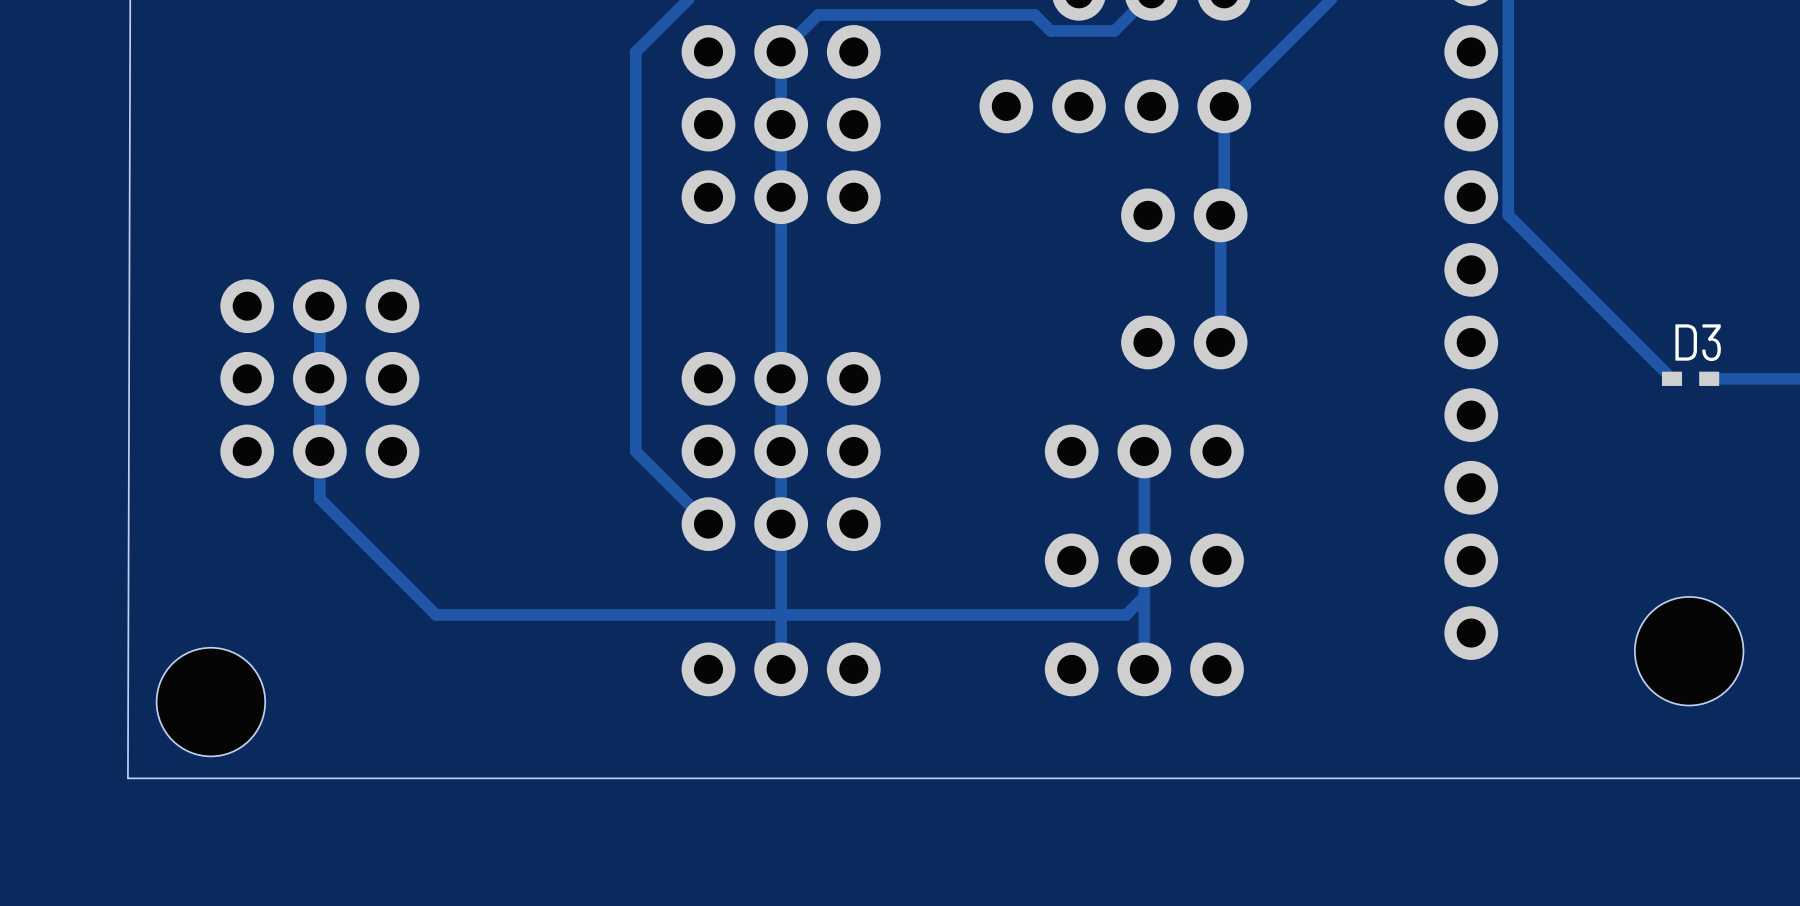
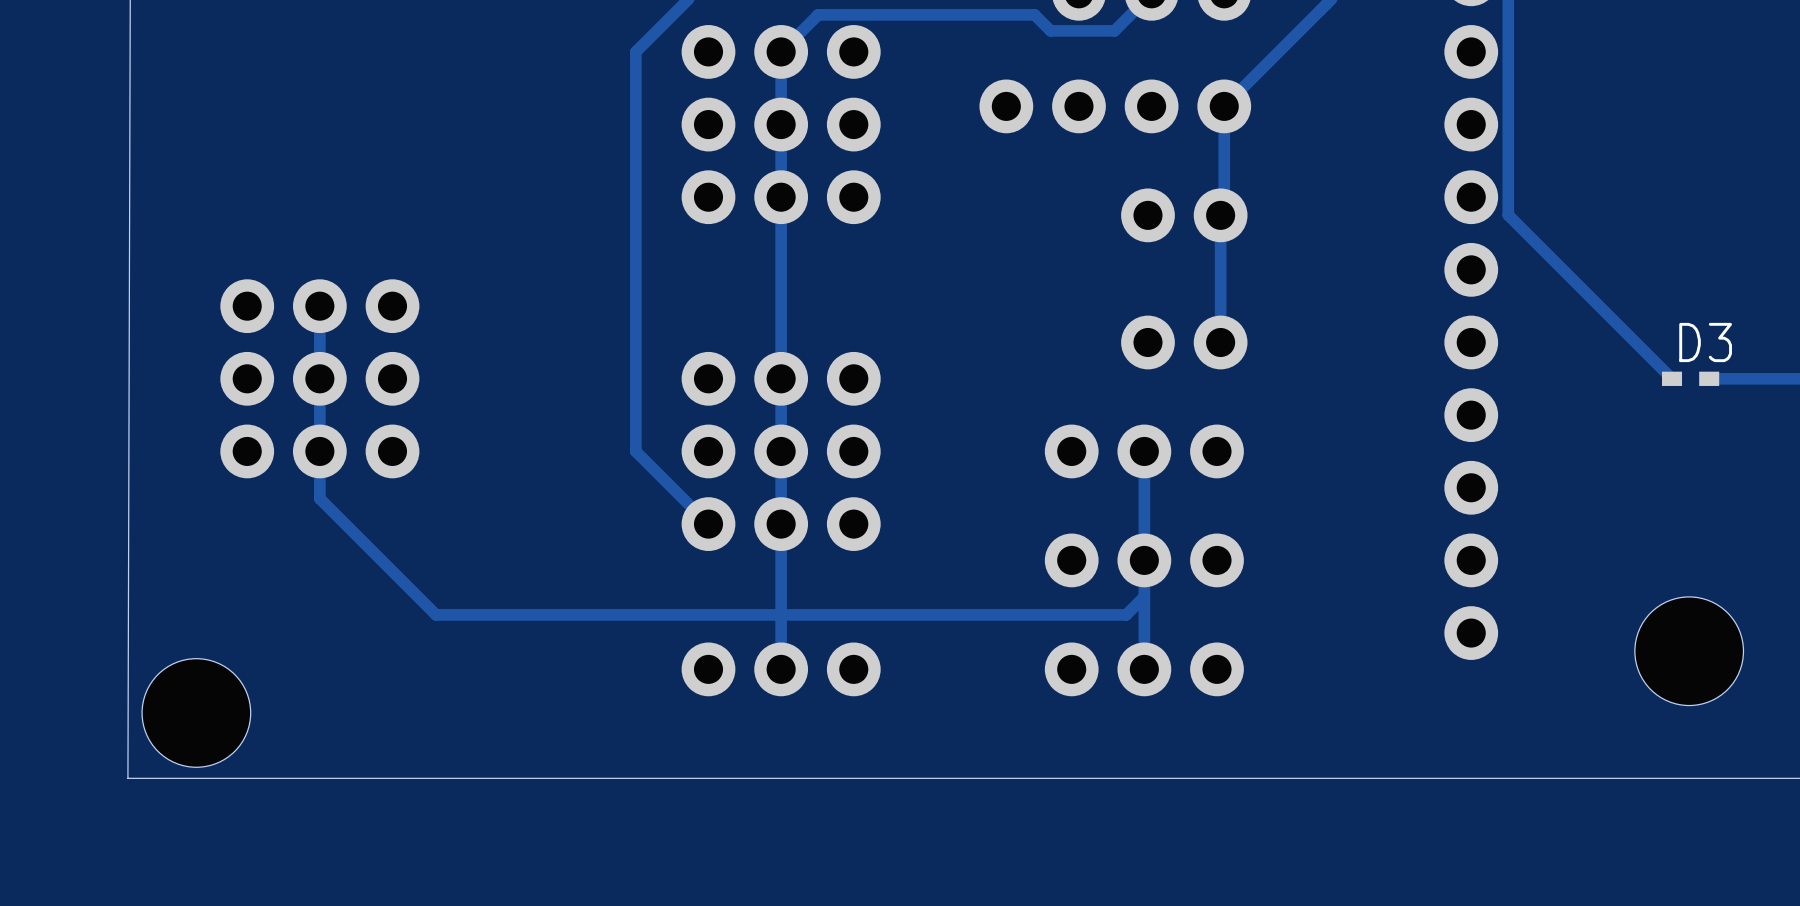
hole position: (210, 702) -> (196, 712)

